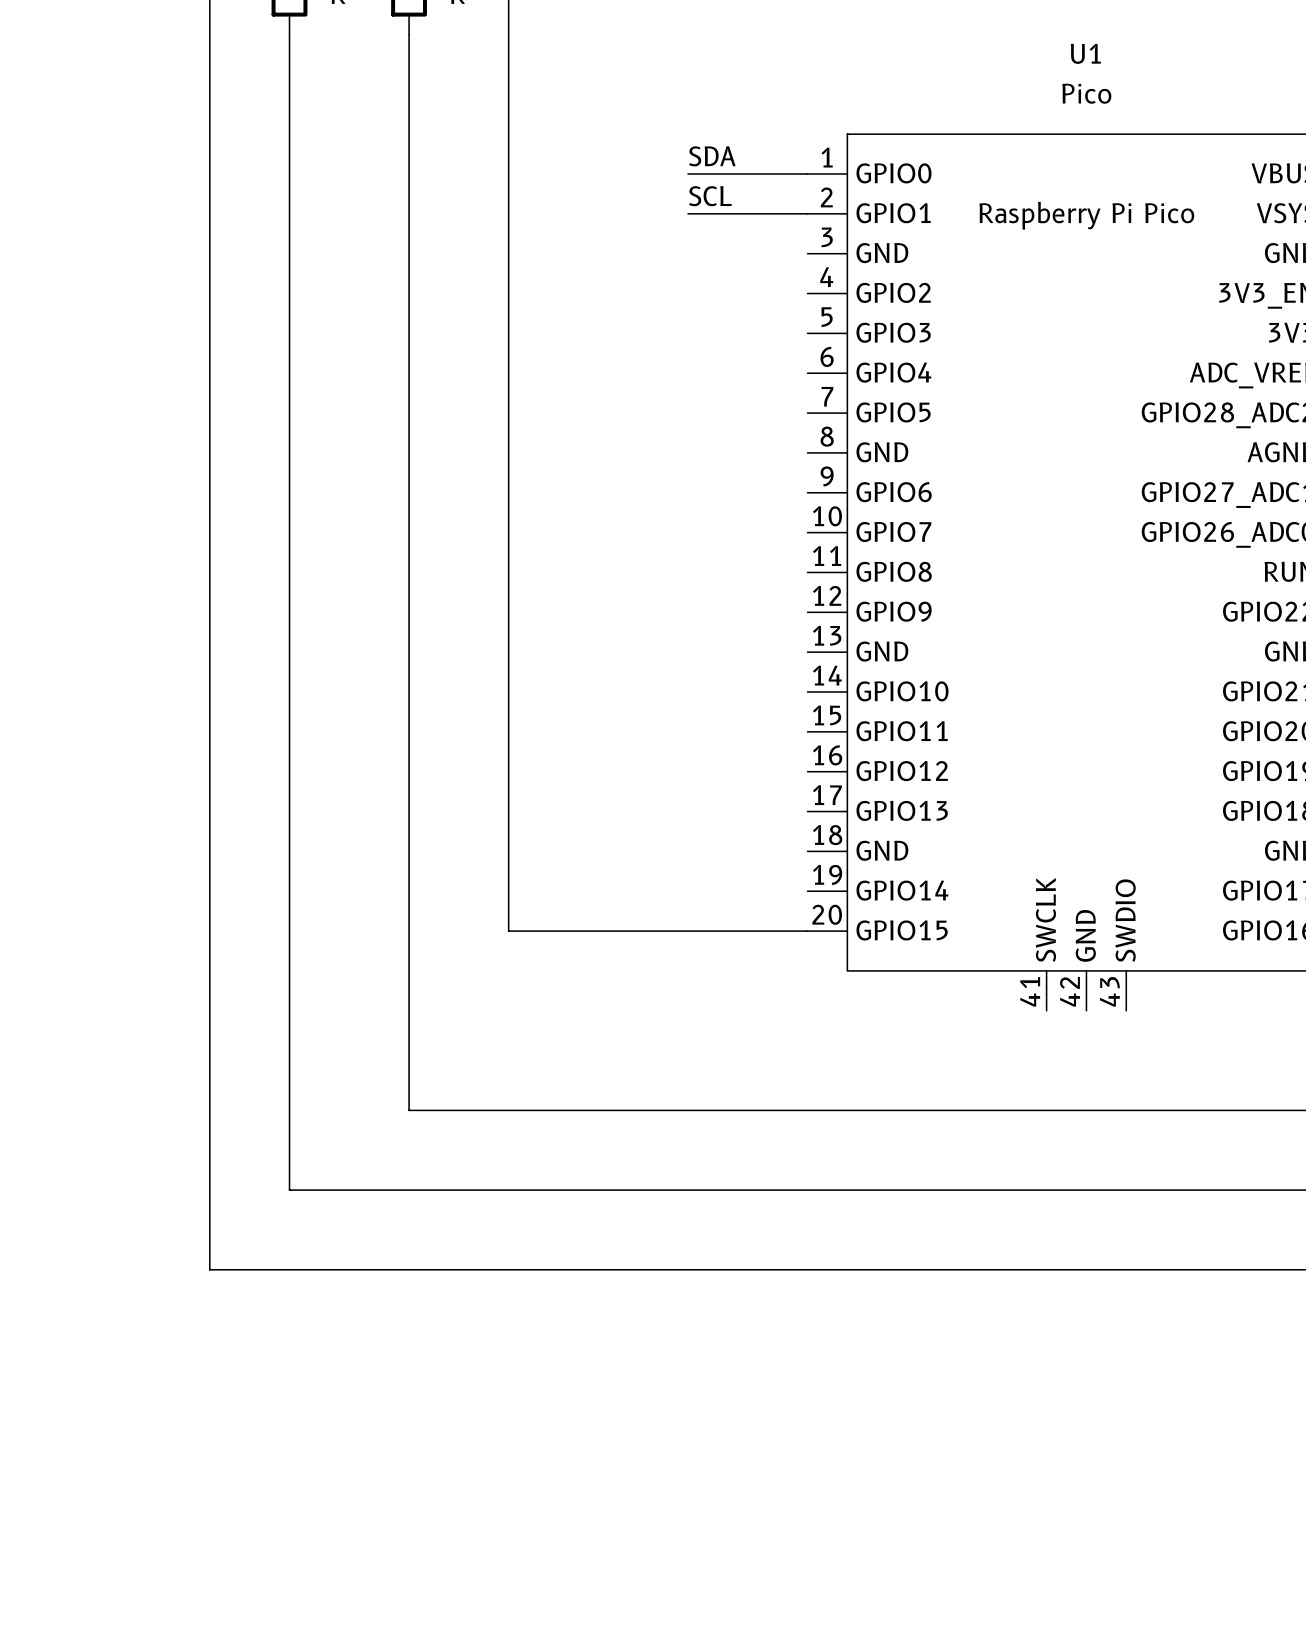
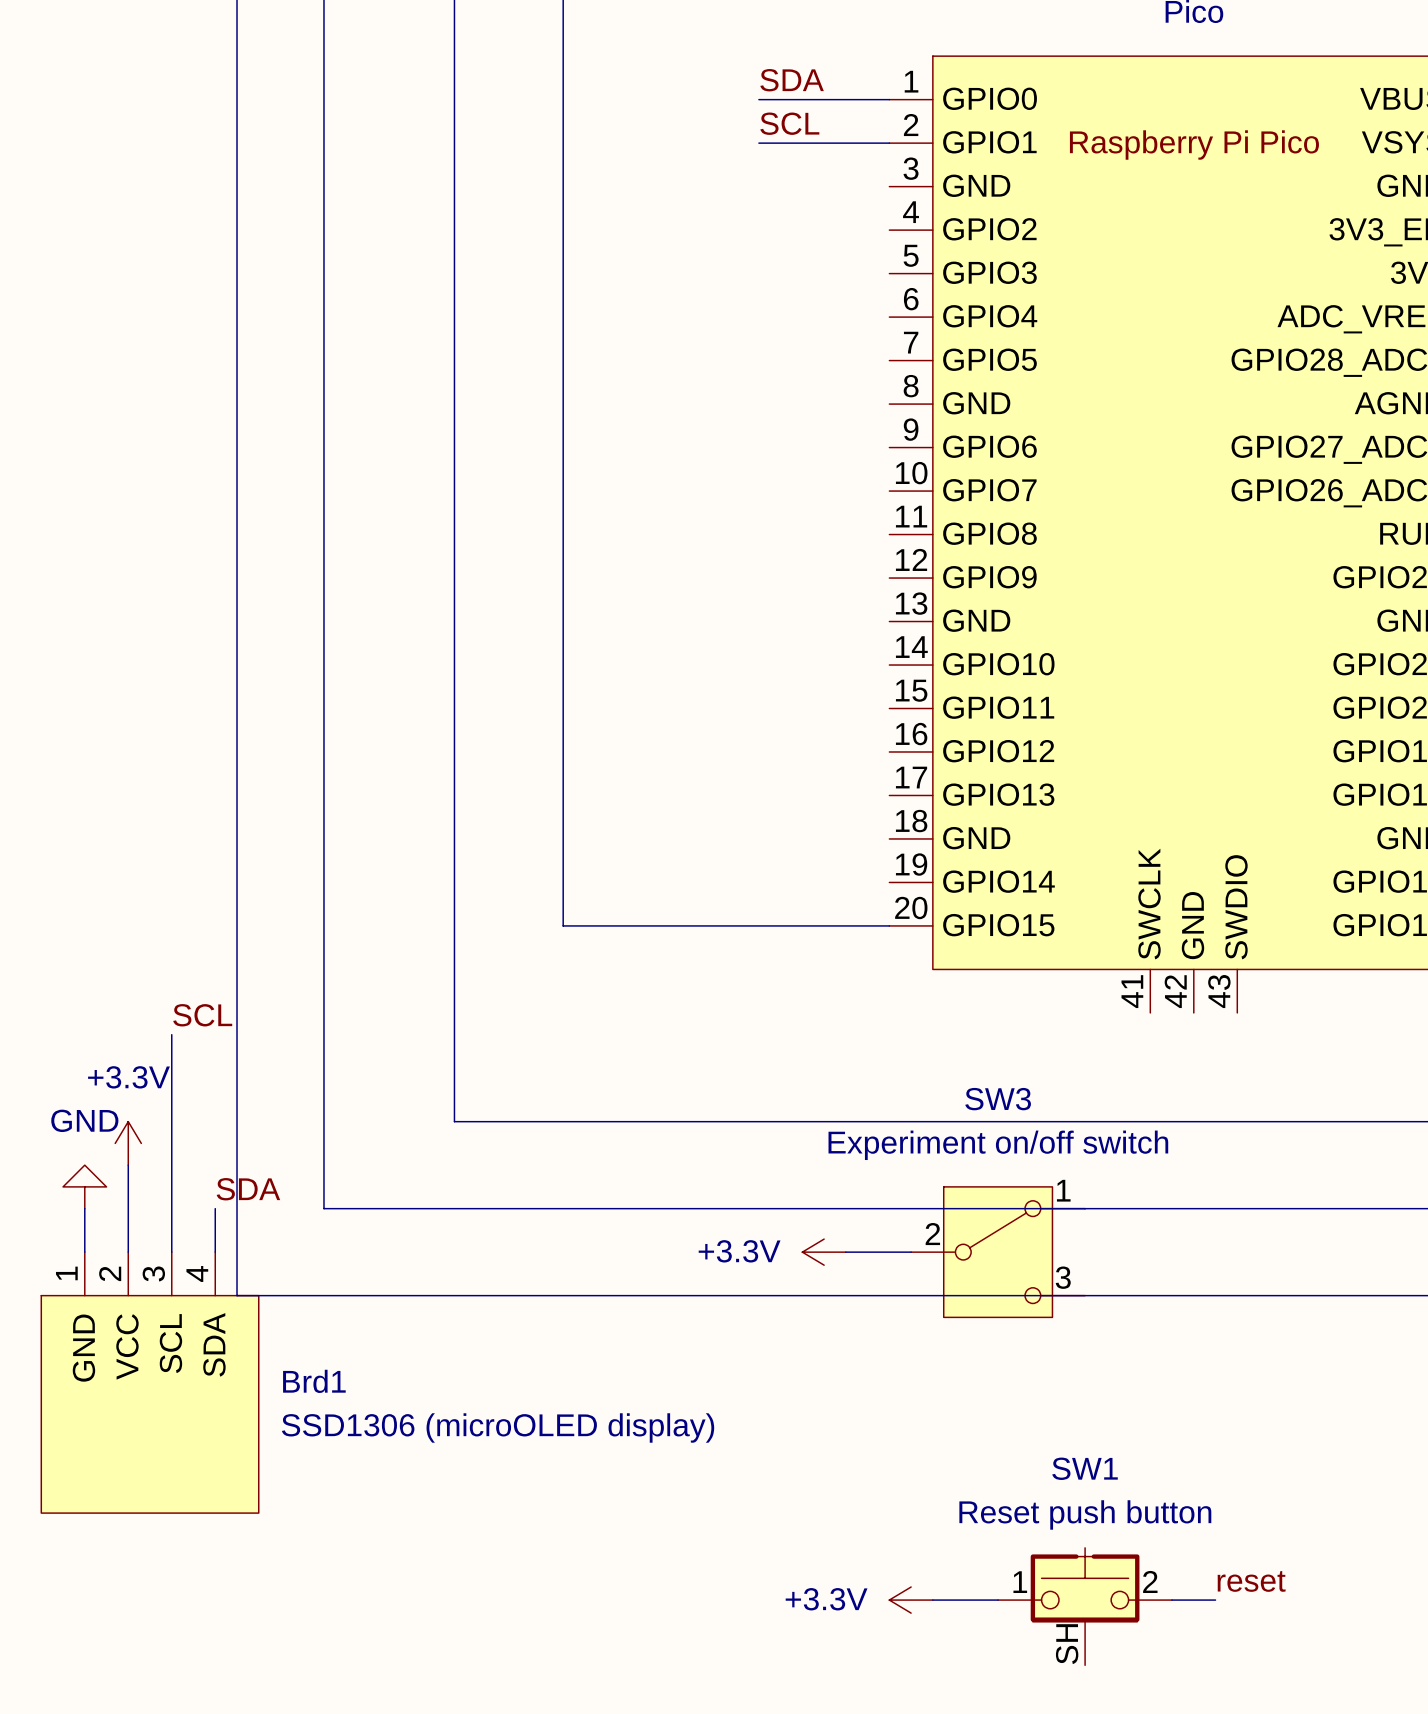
label: none -> SCL (202, 1015)
wire: none -> (171, 1034) (171, 1252)
power symbol: none -> +3.3V (128, 1143)
wire: none -> (128, 1165) (128, 1252)
power symbol: none -> GND (84, 1186)
label: none -> SDA (248, 1189)
wire: none -> (84, 1208) (84, 1252)
wire: none -> (215, 1208) (215, 1252)
power symbol: none -> +3.3V (824, 1252)
wire: none -> (845, 1252) (911, 1252)
SW3: none -> Experiment on/off switch (998, 1252)
Brd1: none -> SSD1306 (microOLED display) (150, 1382)
label: none -> reset (1251, 1581)
power symbol: none -> +3.3V (911, 1600)
wire: none -> (932, 1600) (998, 1600)
wire: none -> (1172, 1600) (1215, 1600)
SW1: none -> Reset push button (1085, 1606)

